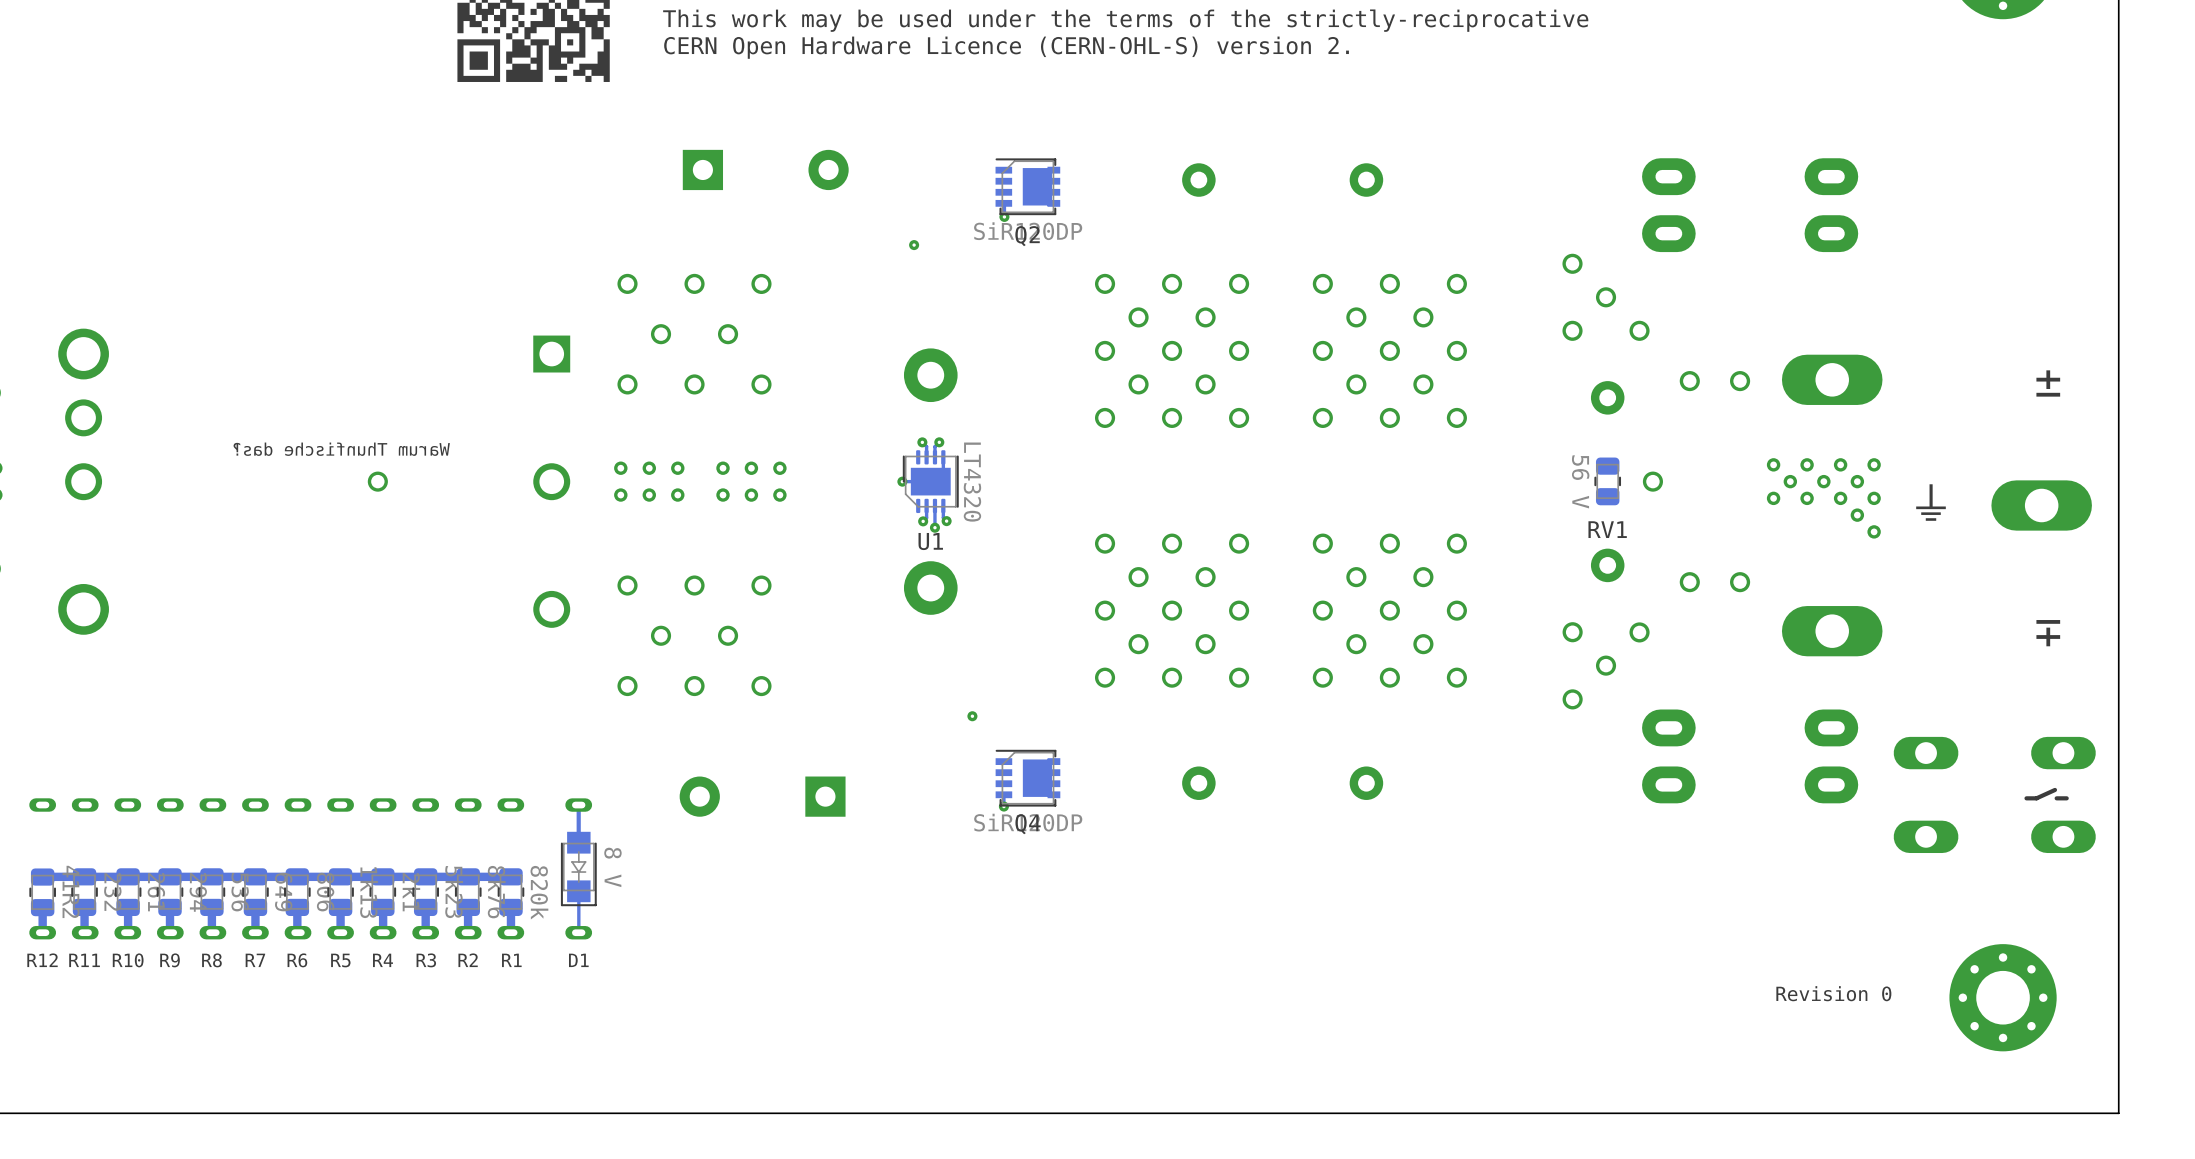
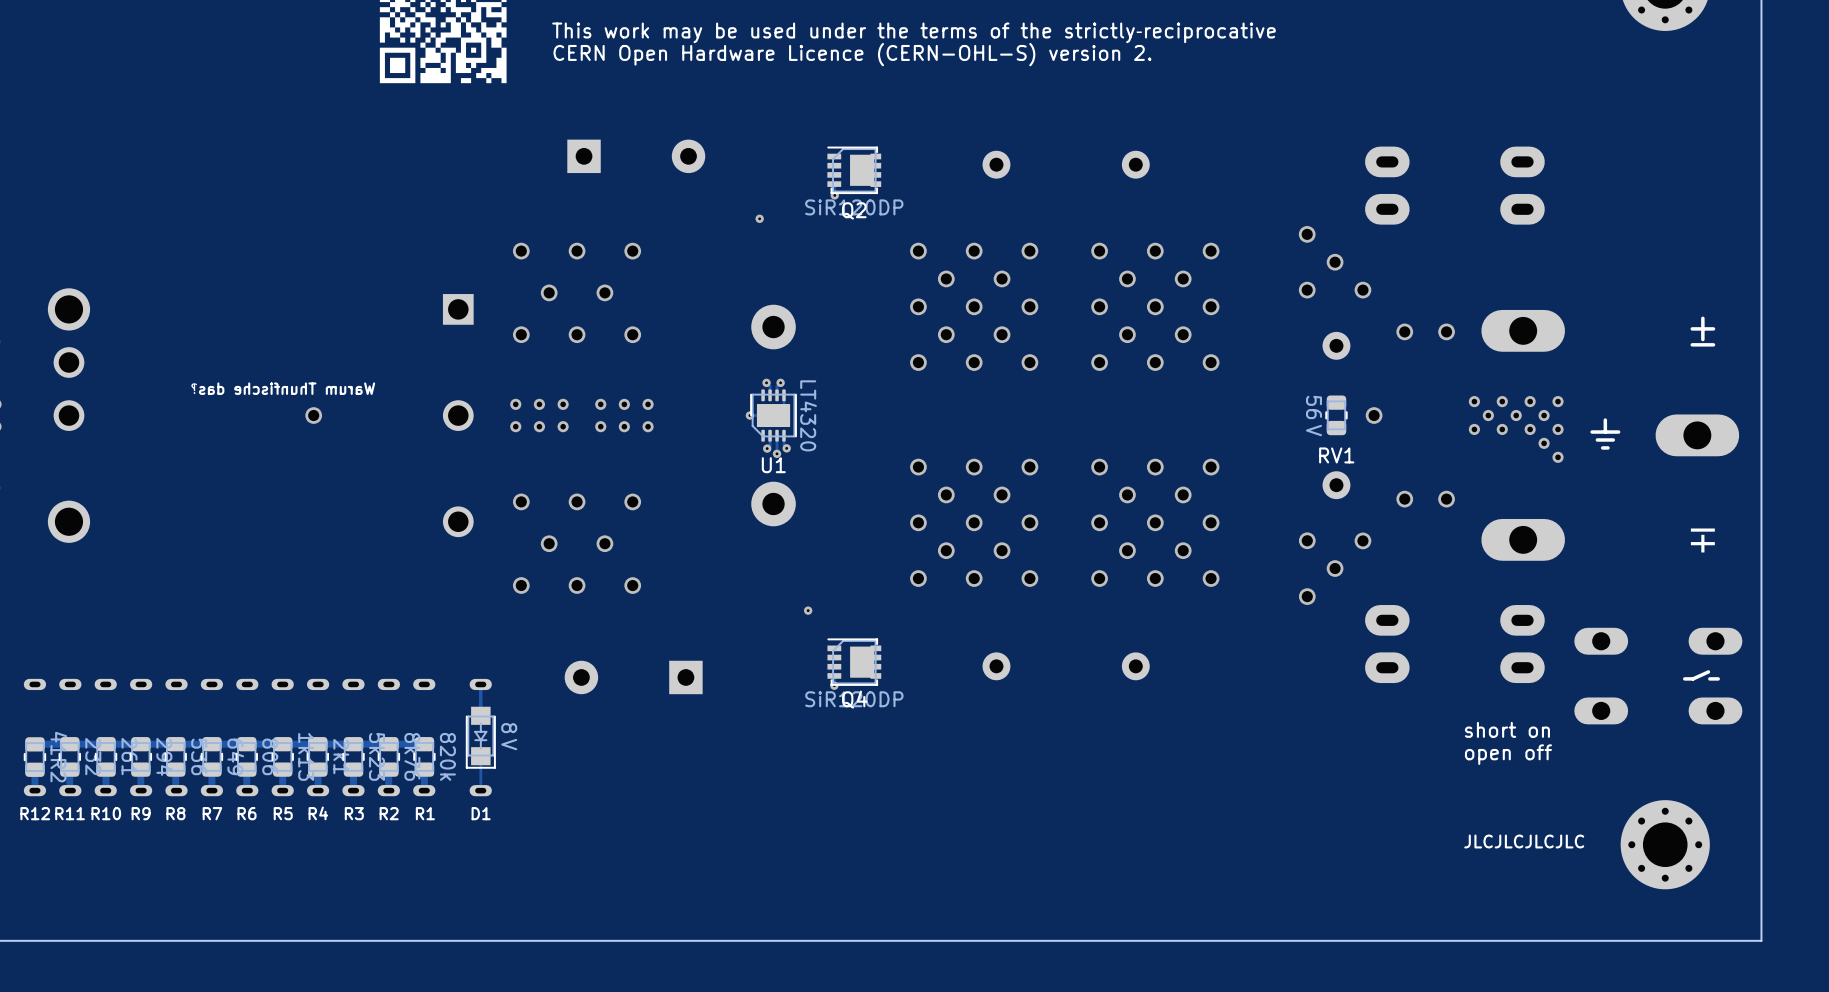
text: none -> short on (1507, 729)
text: none -> open off (1508, 754)
text: Revision 0 (1833, 993) -> JLCJLCJLCJLC (1524, 841)

